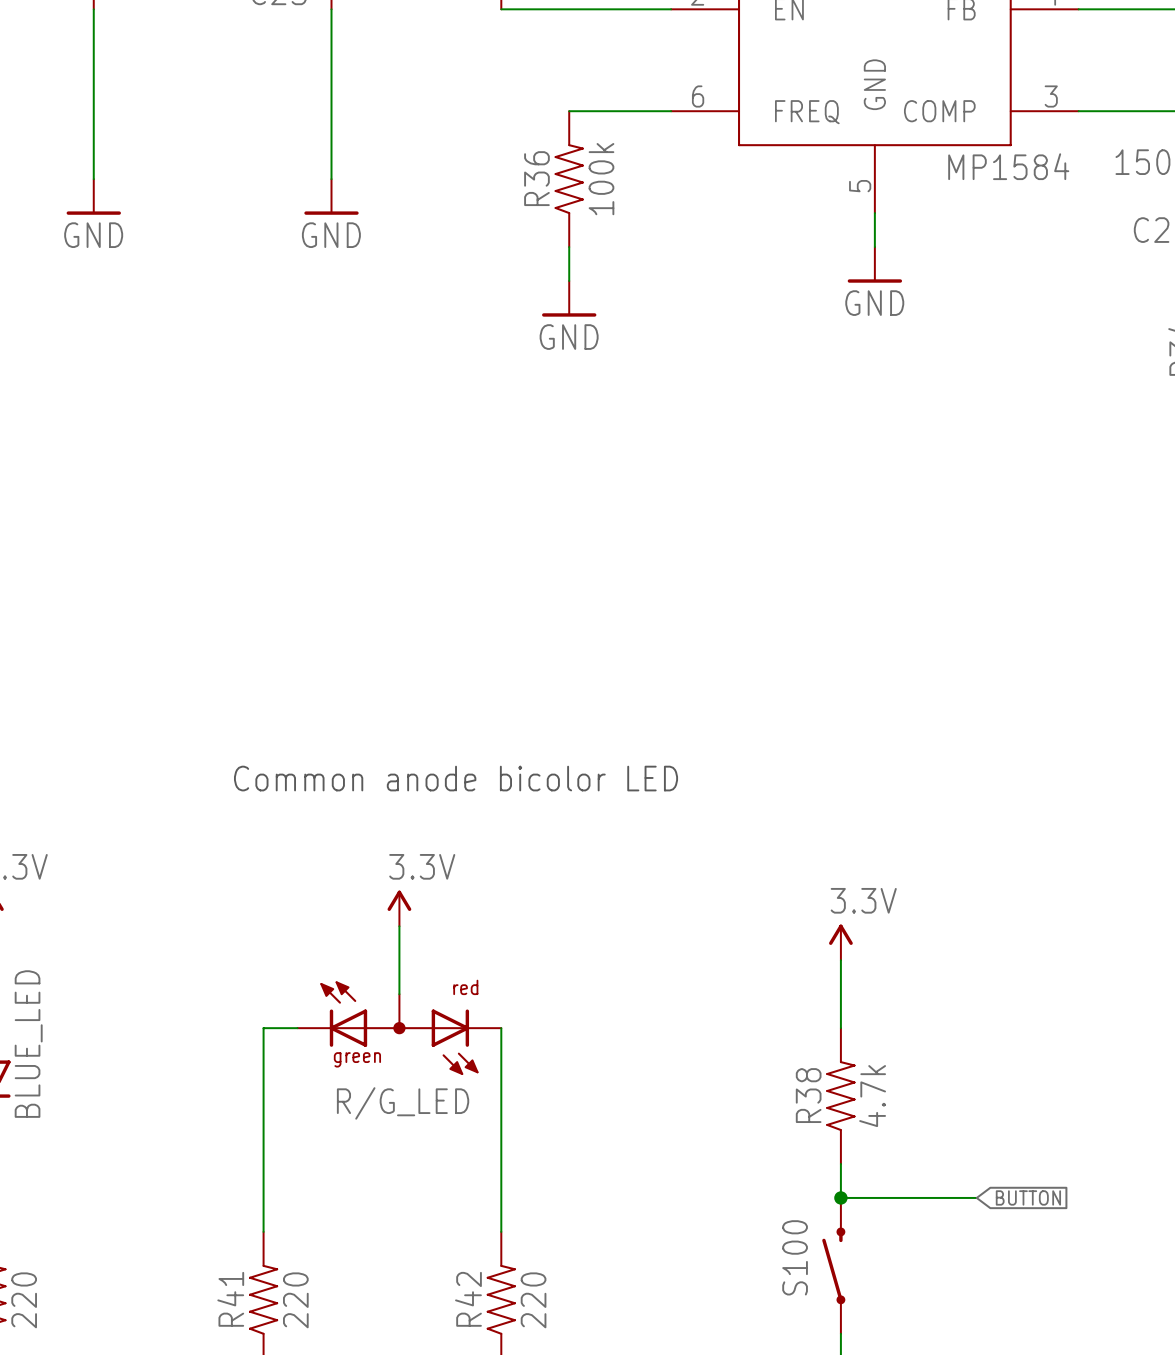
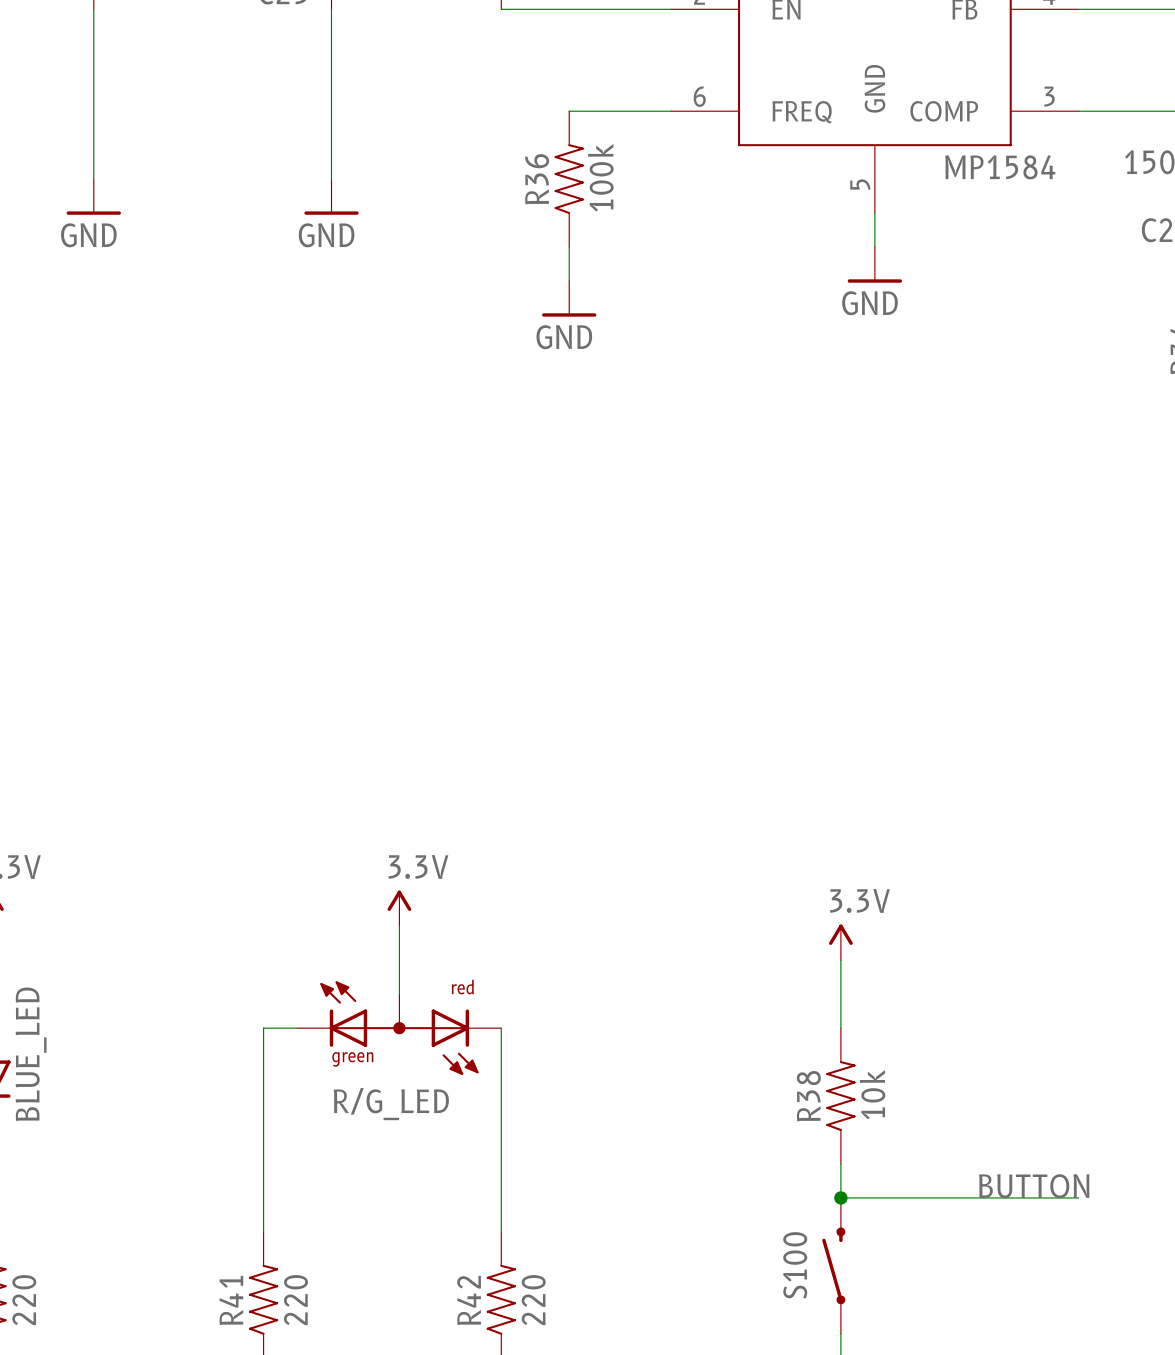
text: Common anode bicolor LED (456, 778) -> none
R38 value: 4.7k (872, 1096) -> 10k (872, 1094)
label: none -> BUTTON (1034, 1186)
wire: none -> (976, 1197) (1078, 1197)
global label: BUTTON (1028, 1197) -> none

